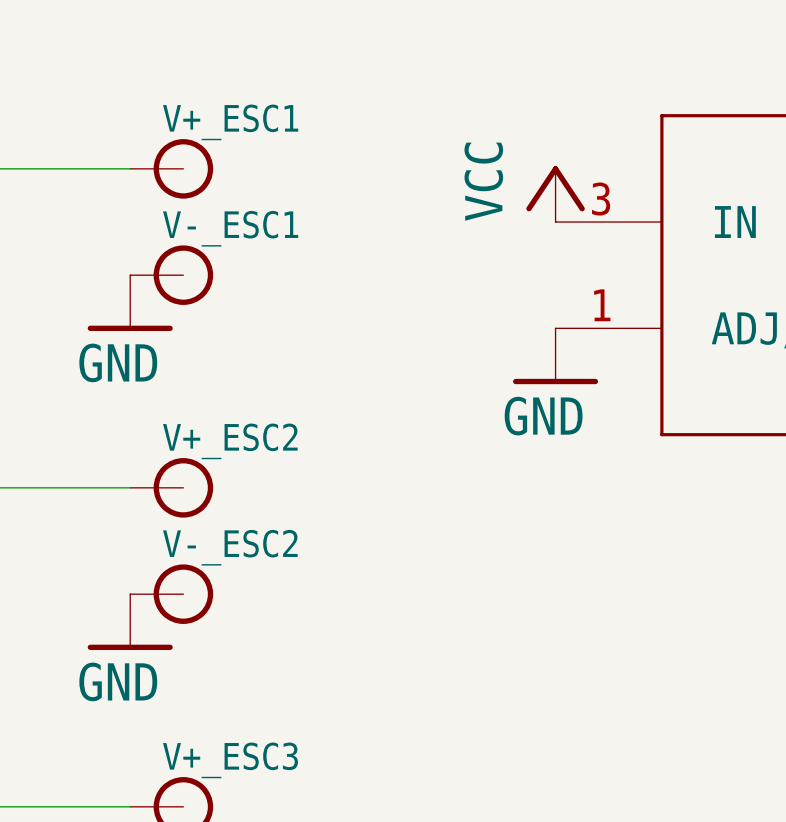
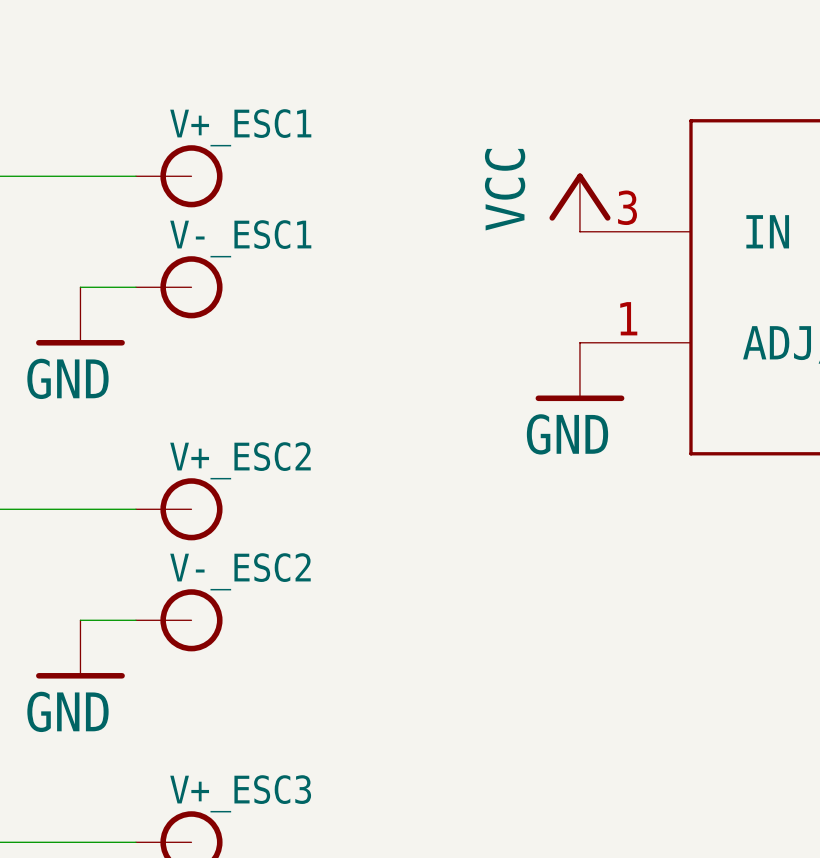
wire: none -> (80, 287) (135, 287)
power symbol position: GND (130, 303) -> GND (80, 316)
wire: none -> (80, 620) (135, 620)
power symbol position: GND (130, 622) -> GND (80, 649)

